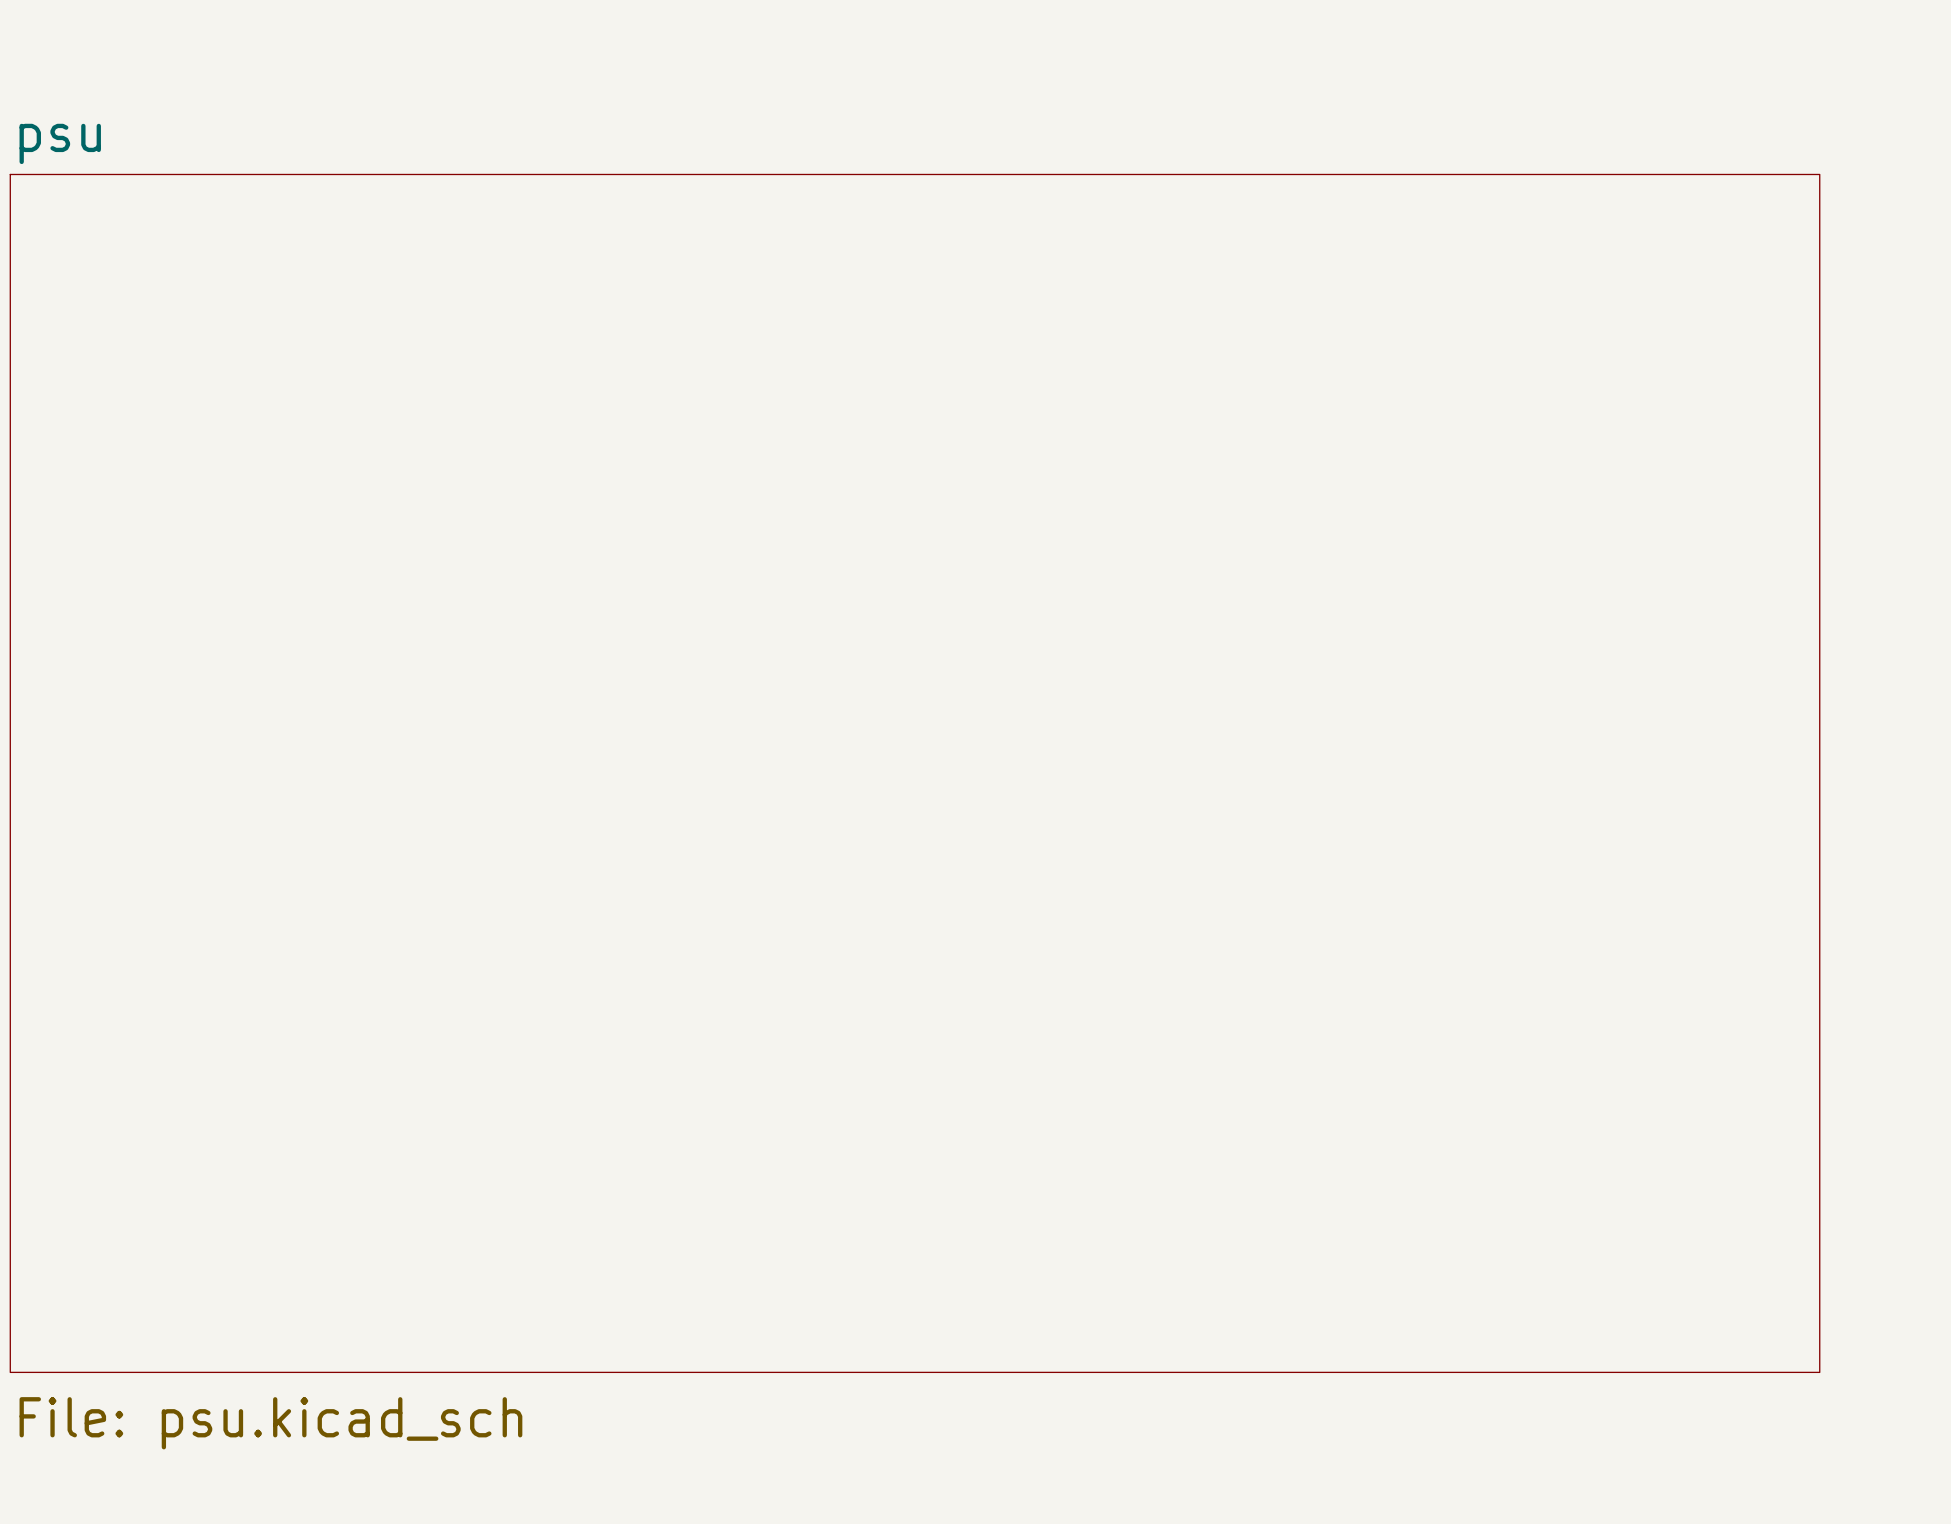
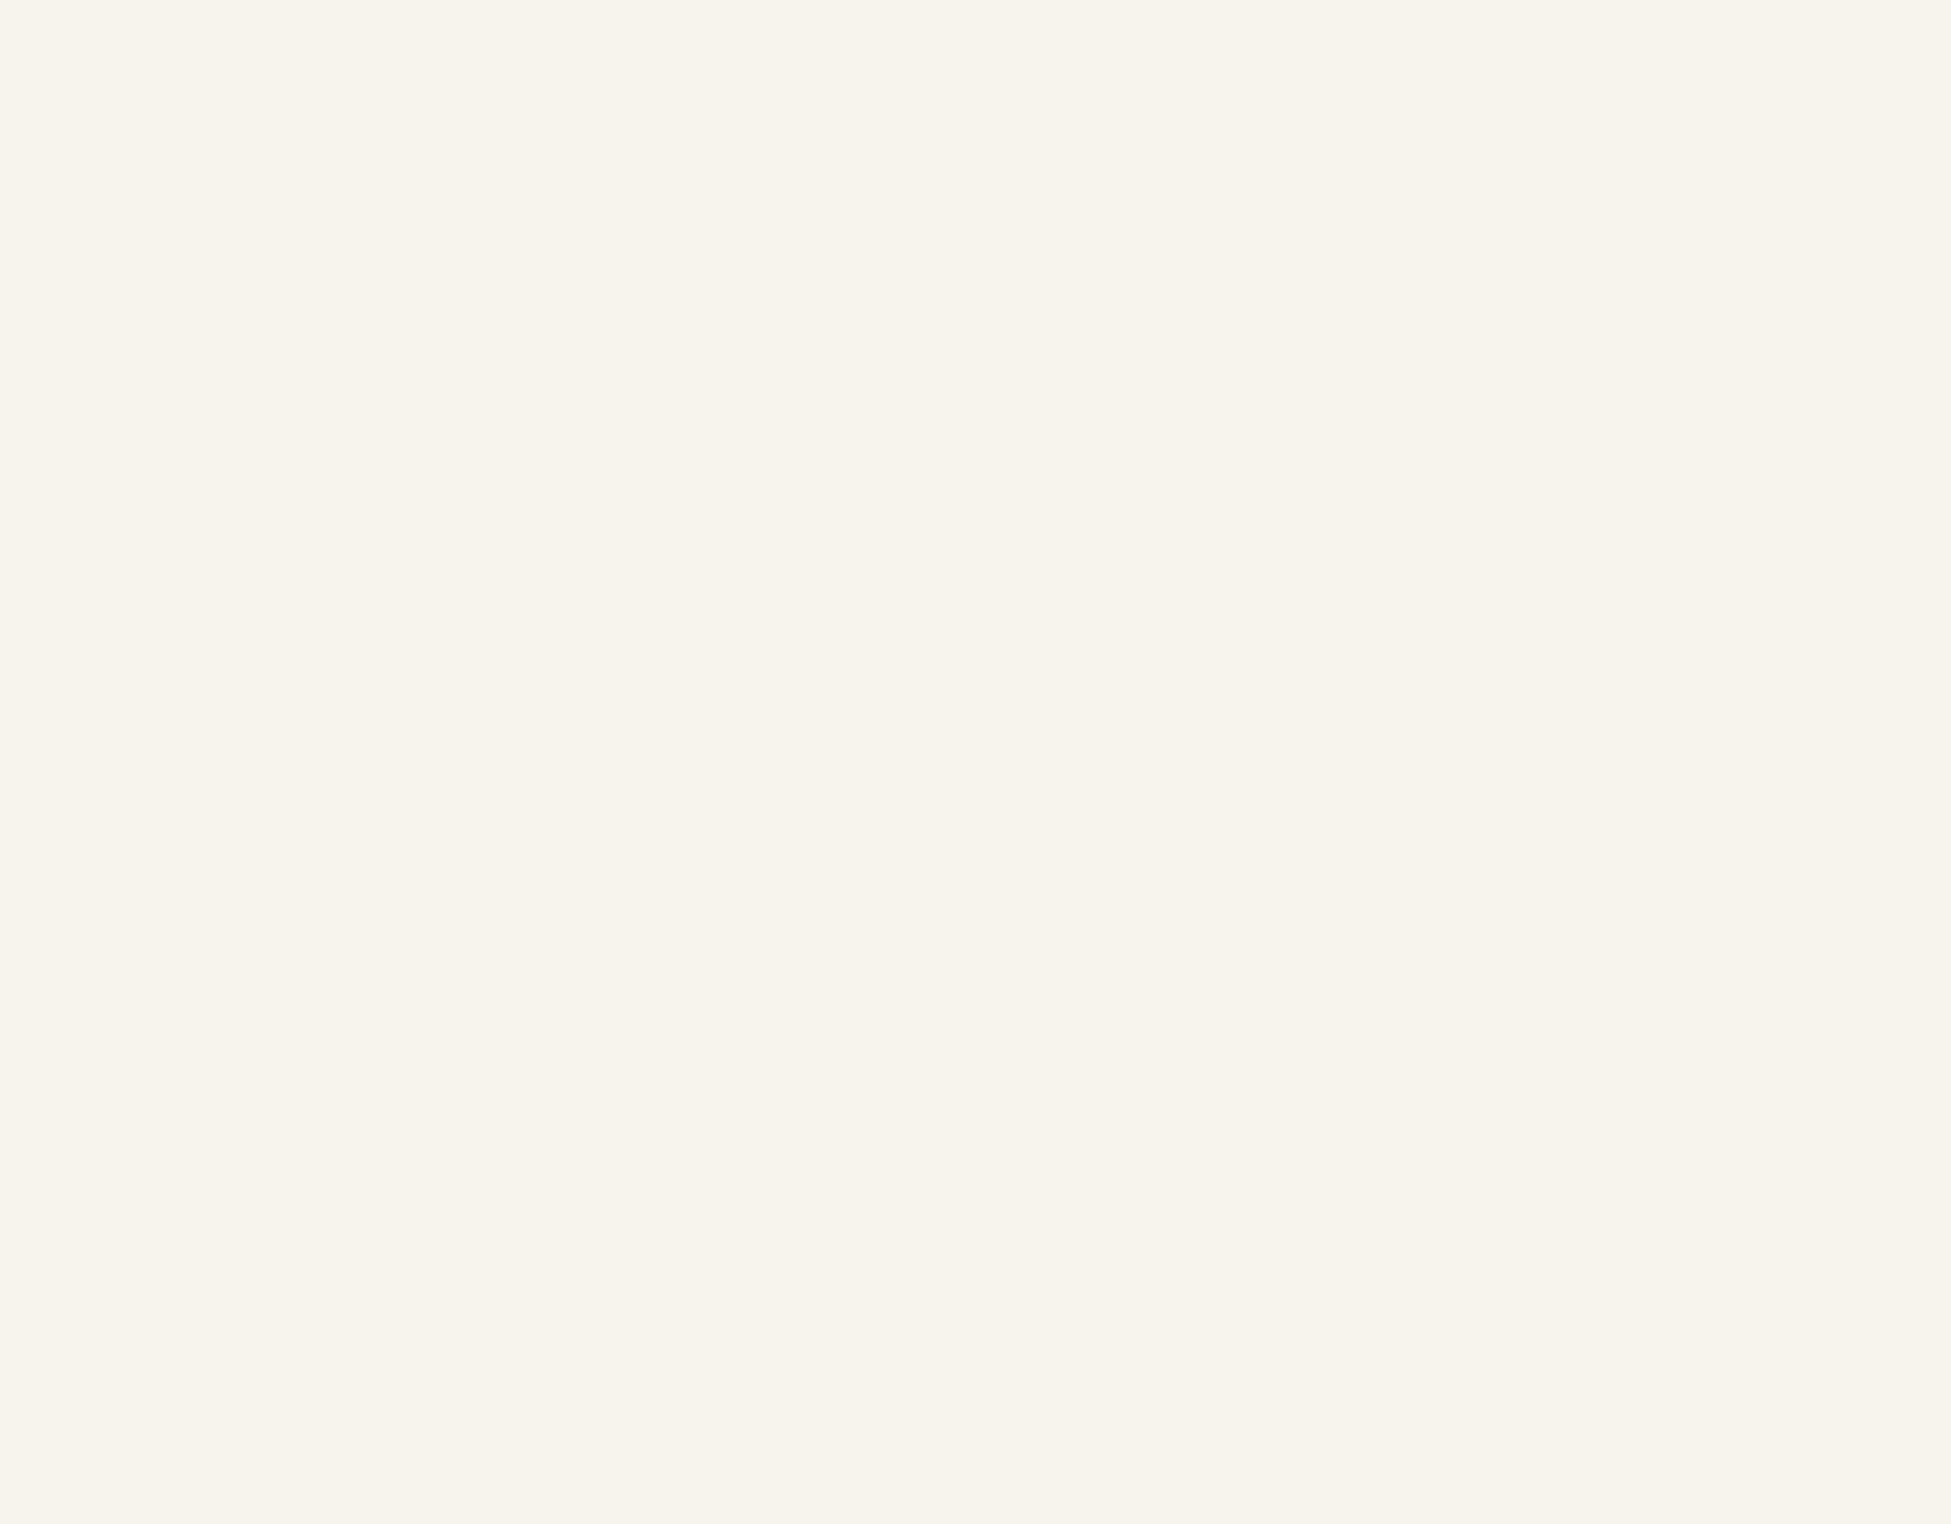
sheet psu: File: psu.kicad_sch (915, 773) -> none

